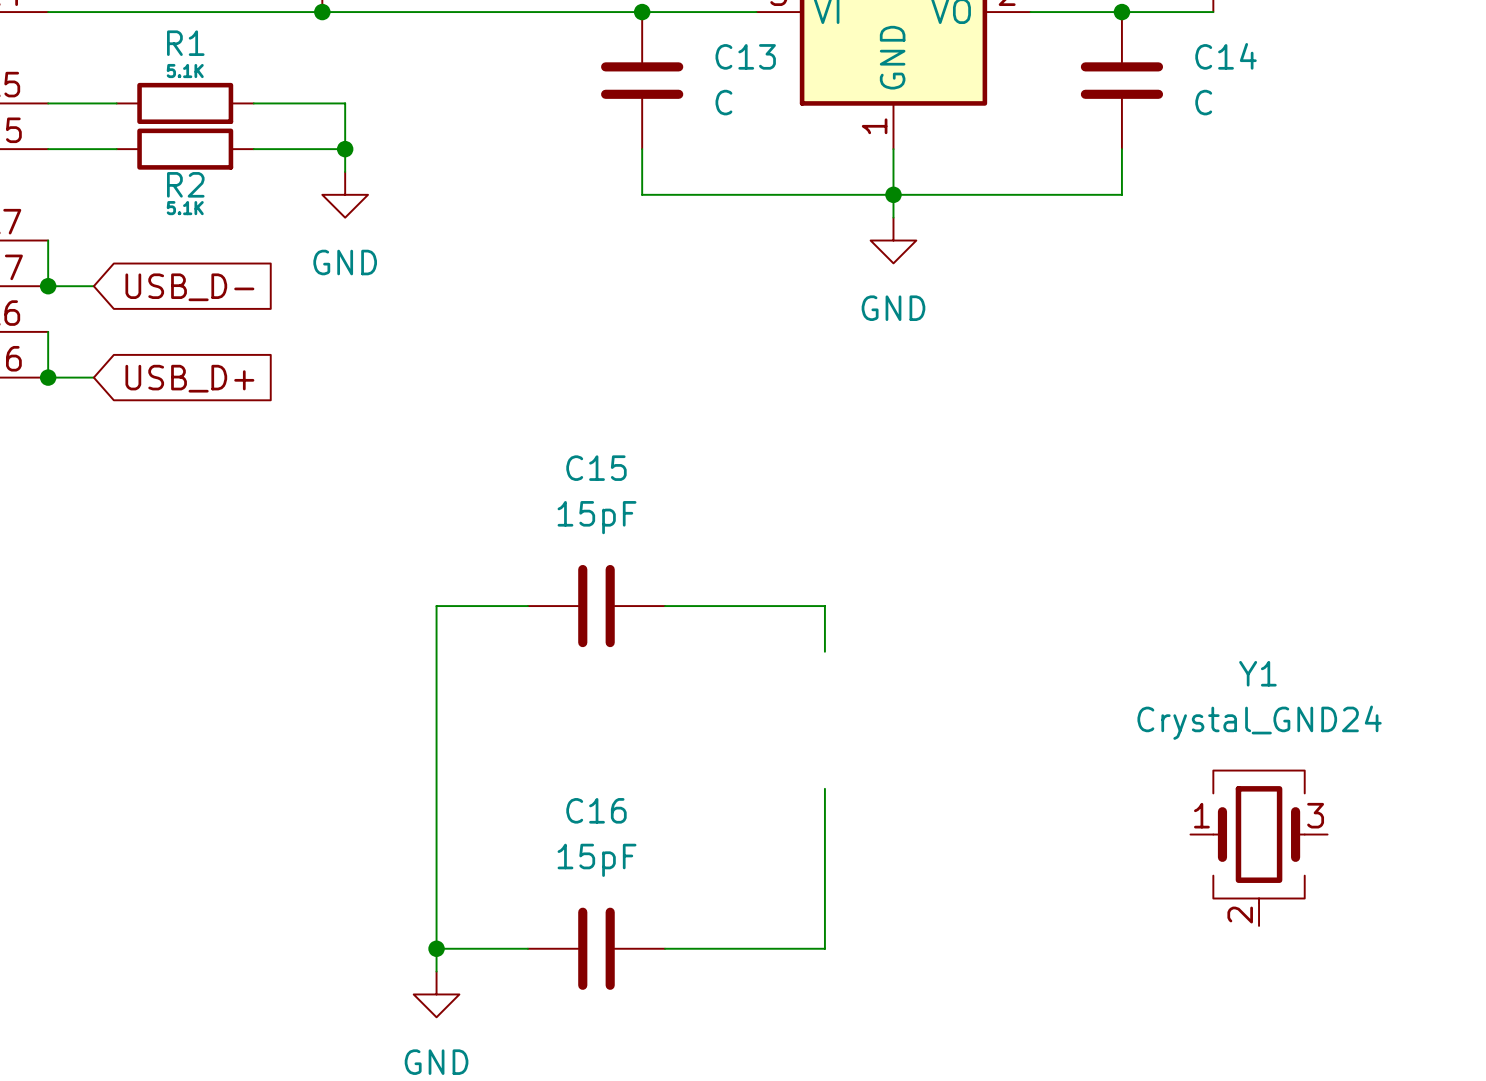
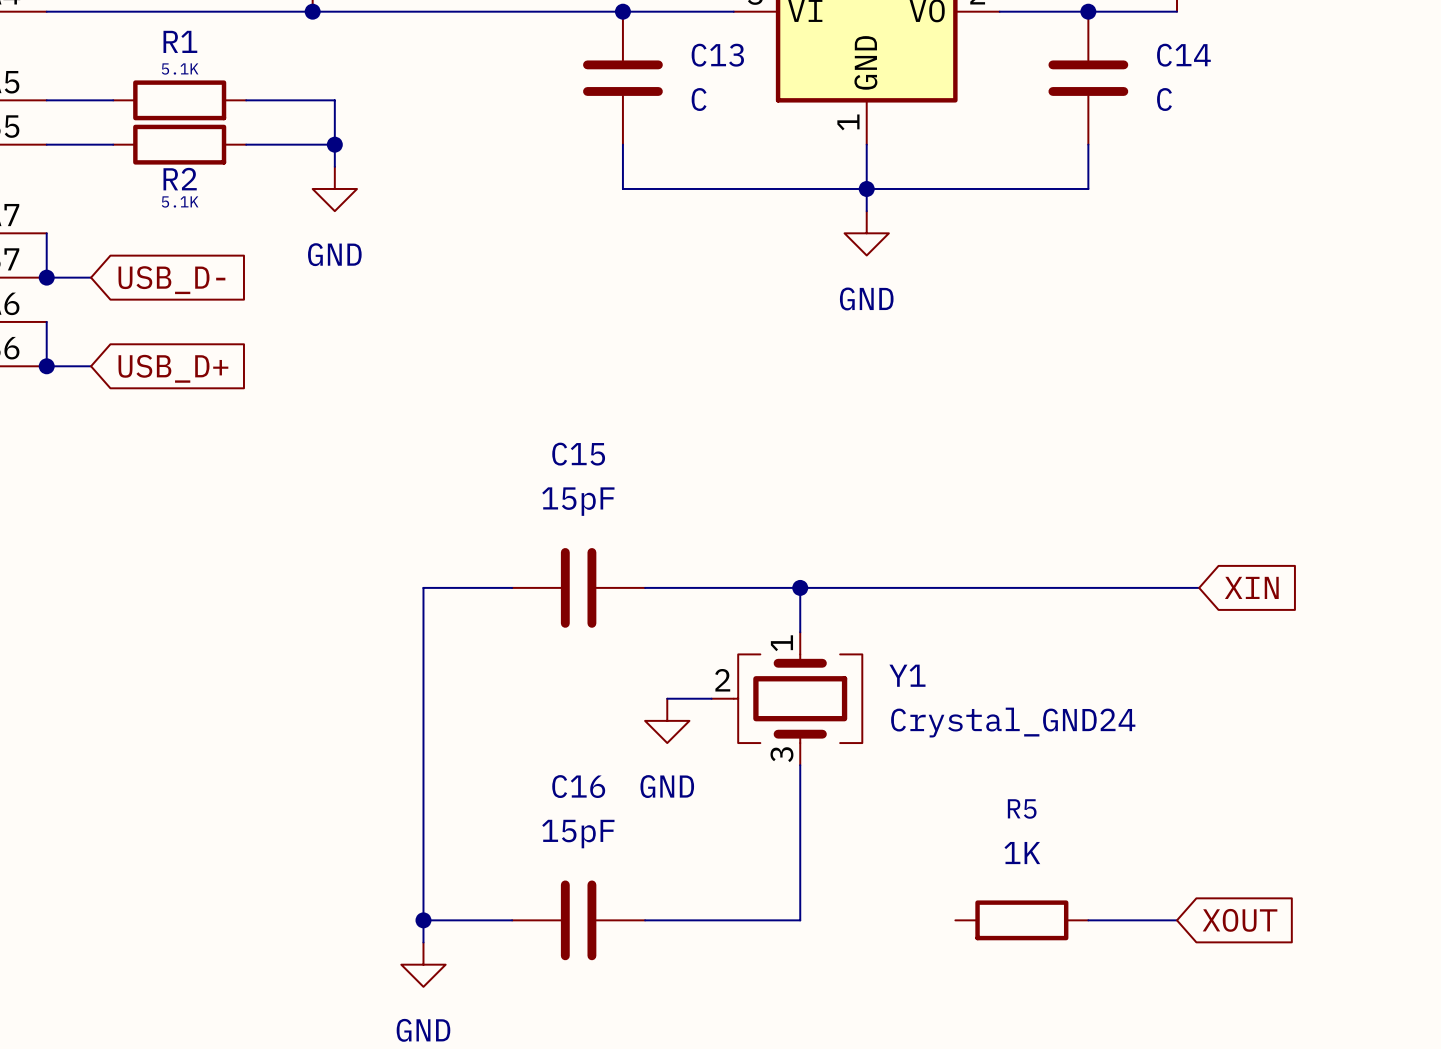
wire: none -> (800, 587) (1199, 587)
junction: none -> (800, 587)
global label: none -> XIN (1251, 587)
Y1 name position: Y1 (1257, 673) -> Y1 (907, 675)
wire: none -> (667, 698) (711, 698)
Y1 value position: Crystal_GND24 (1259, 722) -> Crystal_GND24 (1013, 722)
power symbol: none -> GND (667, 720)
Y1 rotation: 0° (1259, 836) -> 90° clockwise (798, 698)
Y1 position: (1259, 848) -> (786, 698)
R5: none -> 1K (1021, 920)
wire: none -> (1088, 920) (1177, 920)
global label: none -> XOUT (1240, 920)

